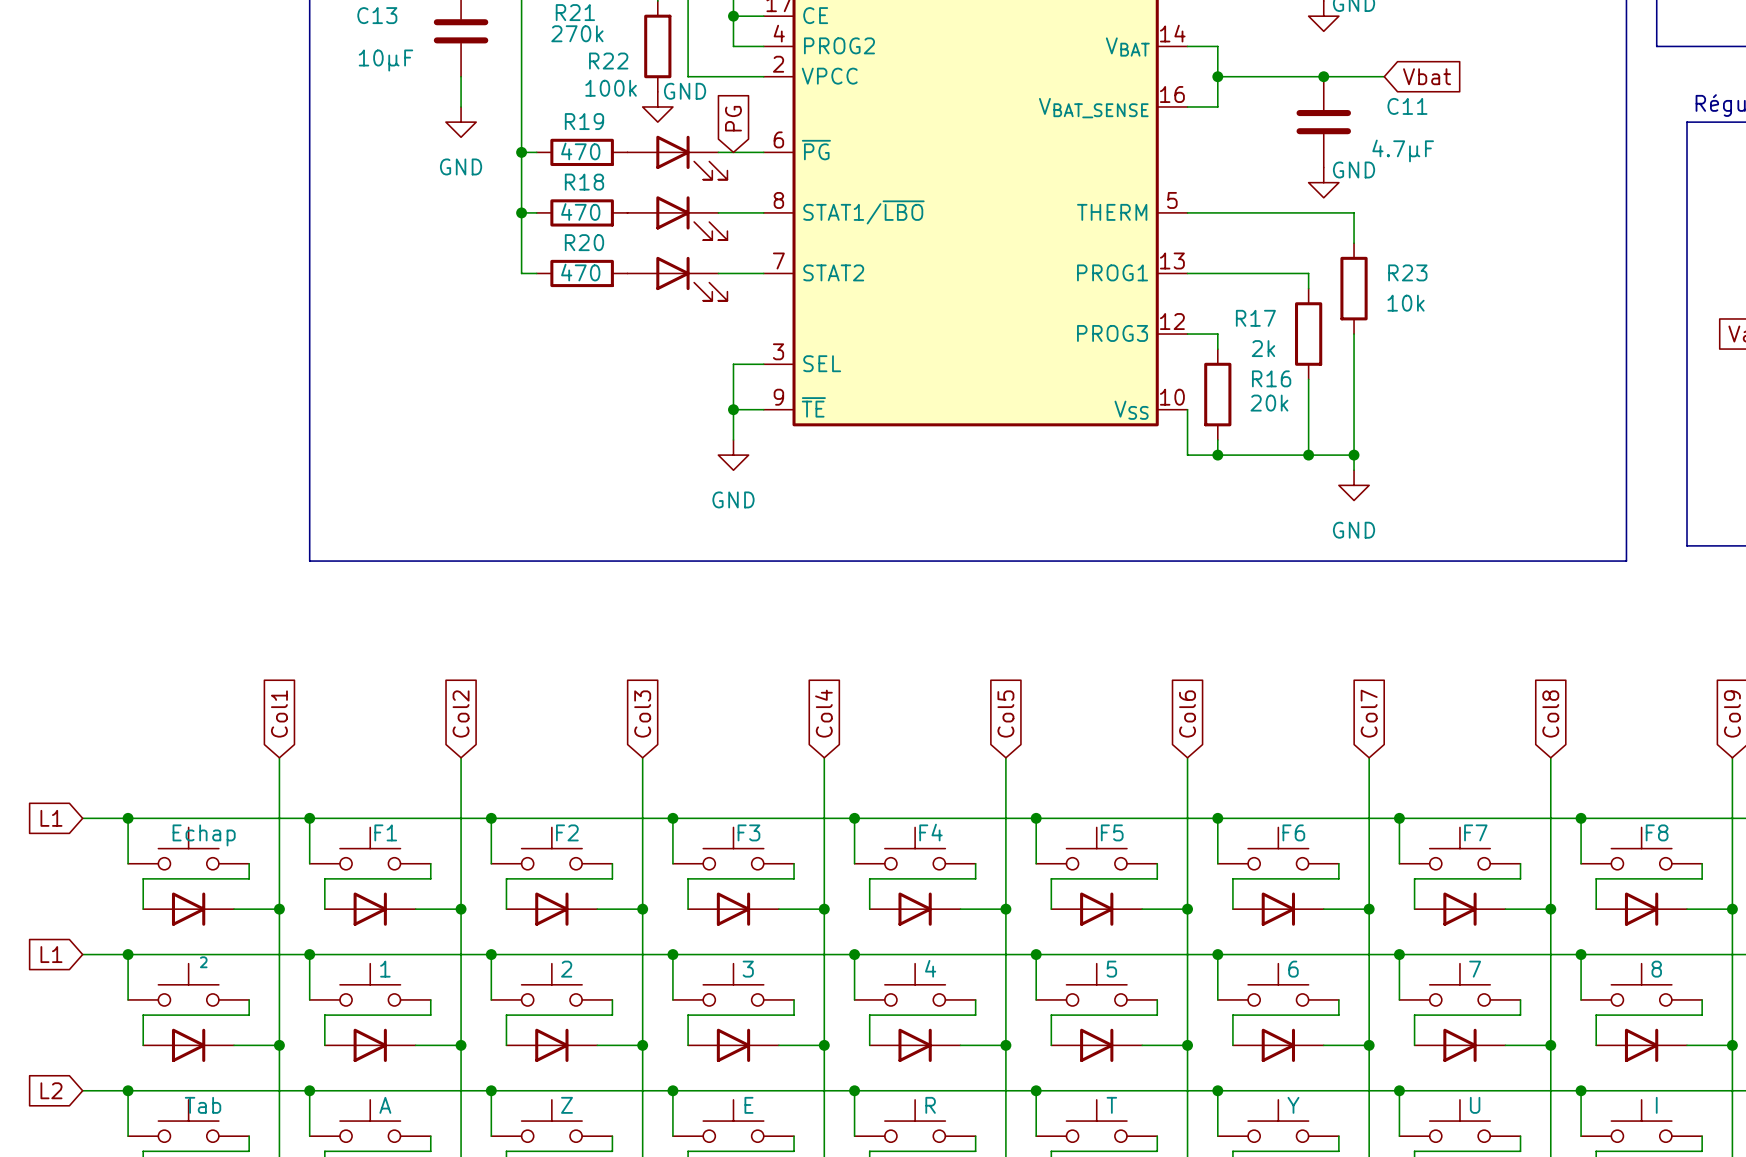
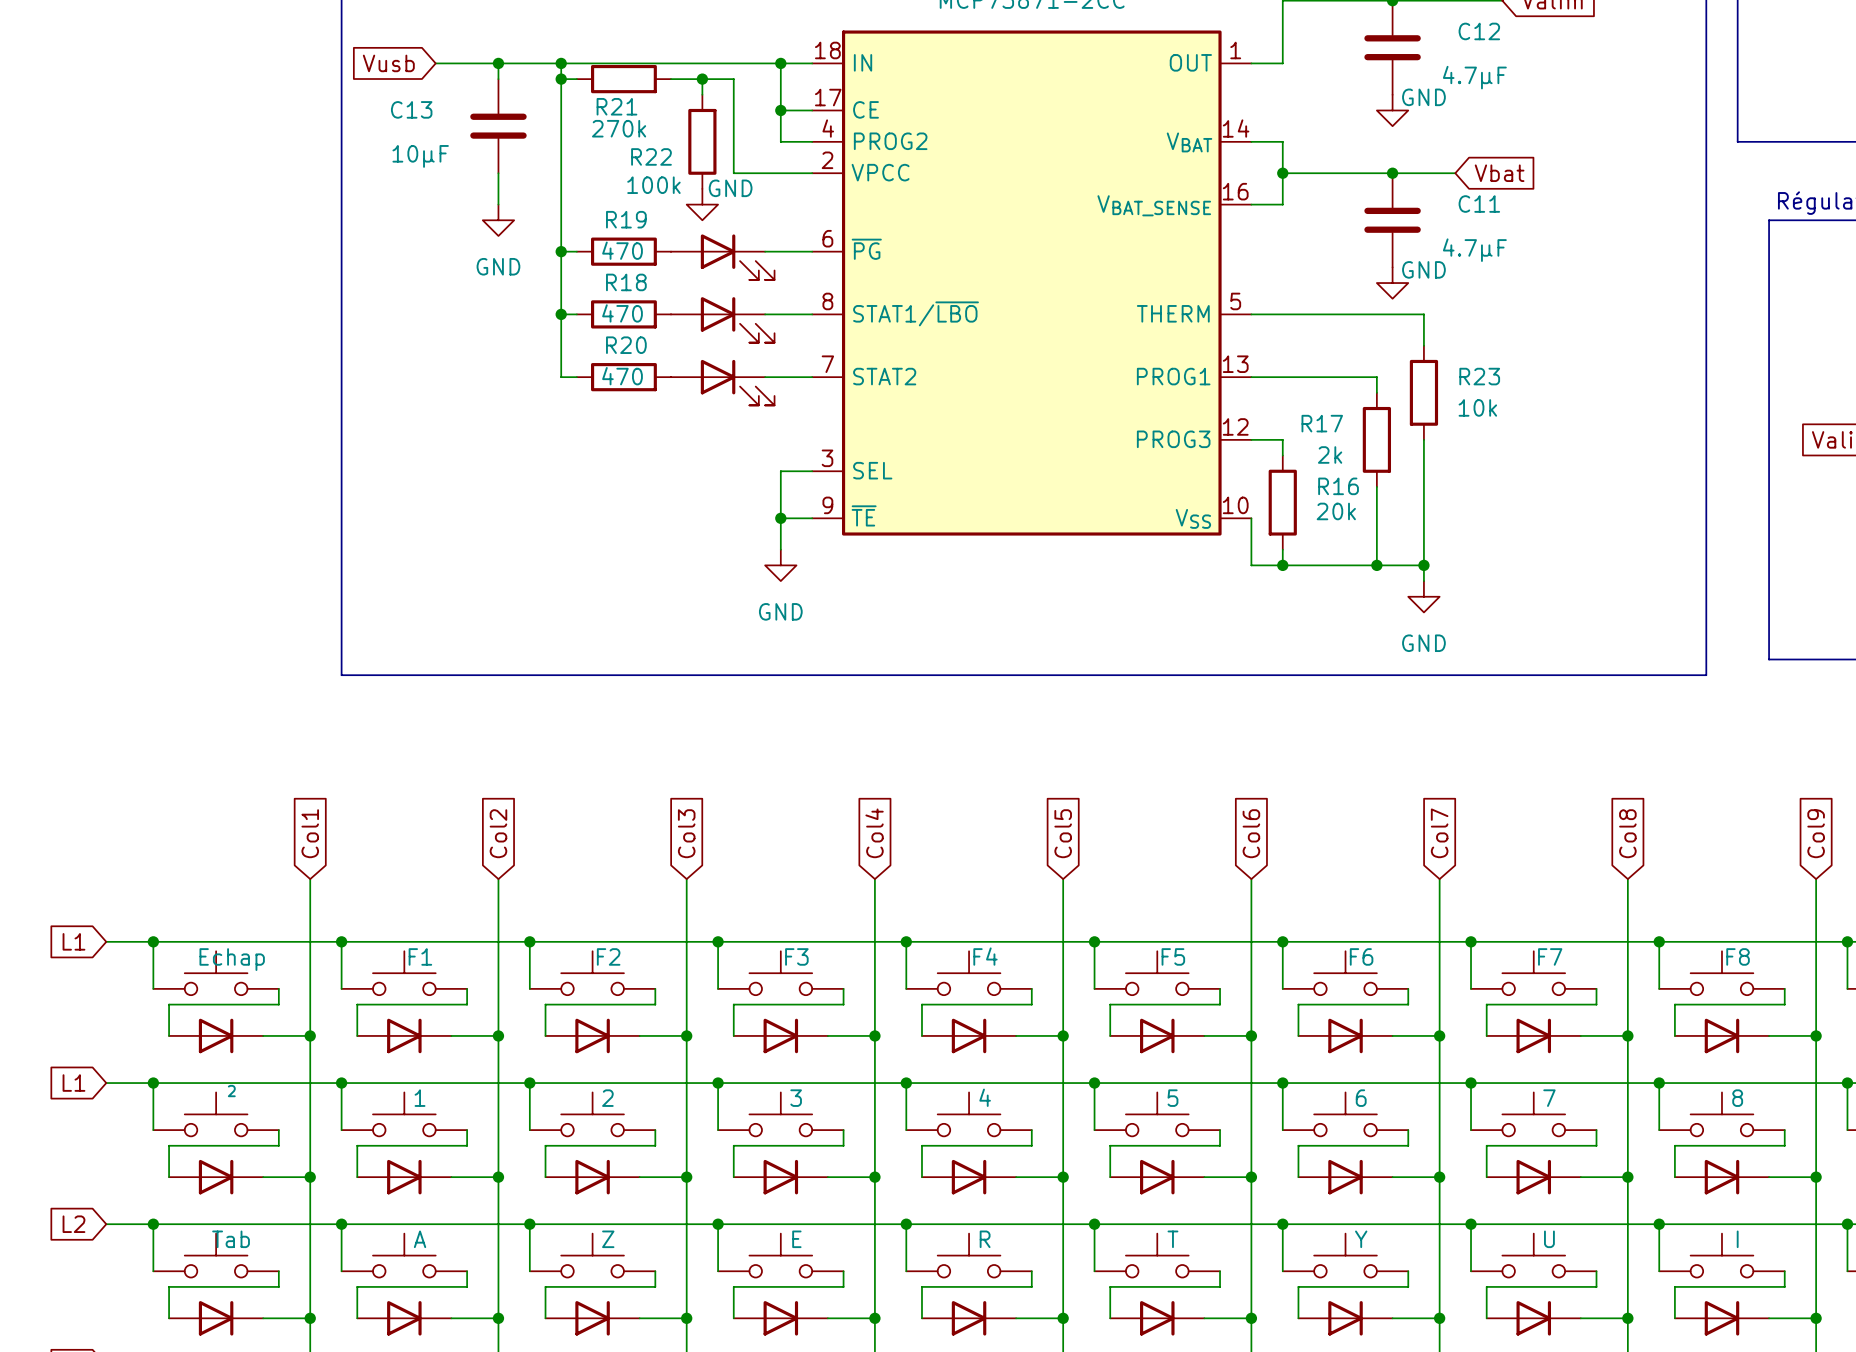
global label: PG (733, 118) -> none

